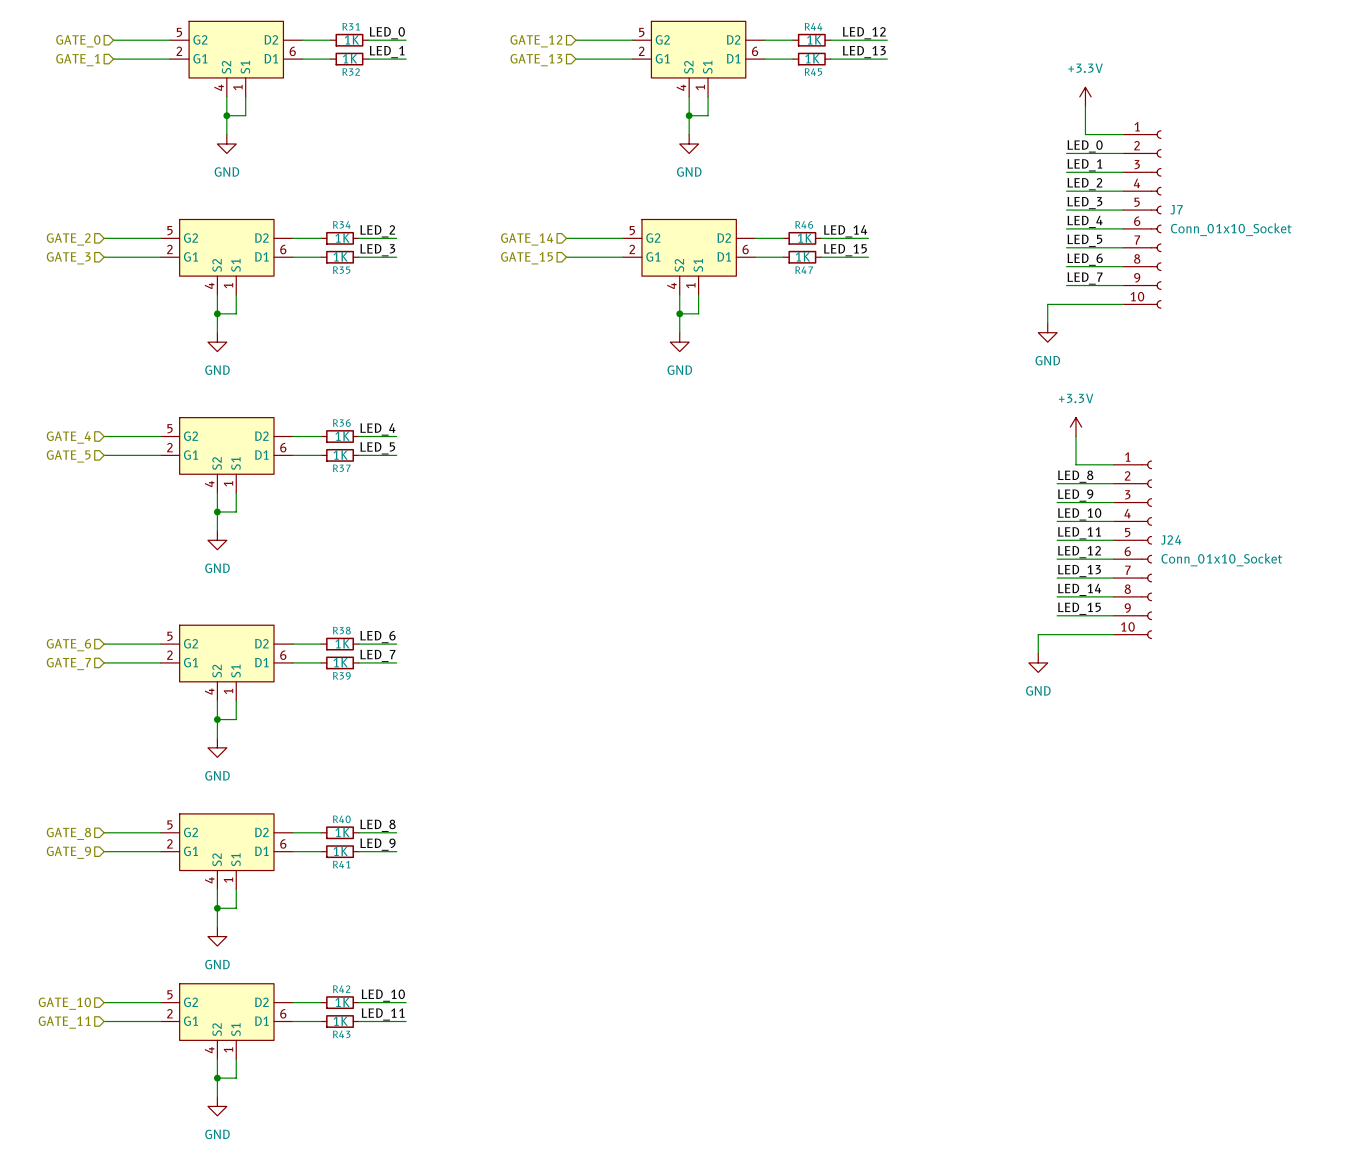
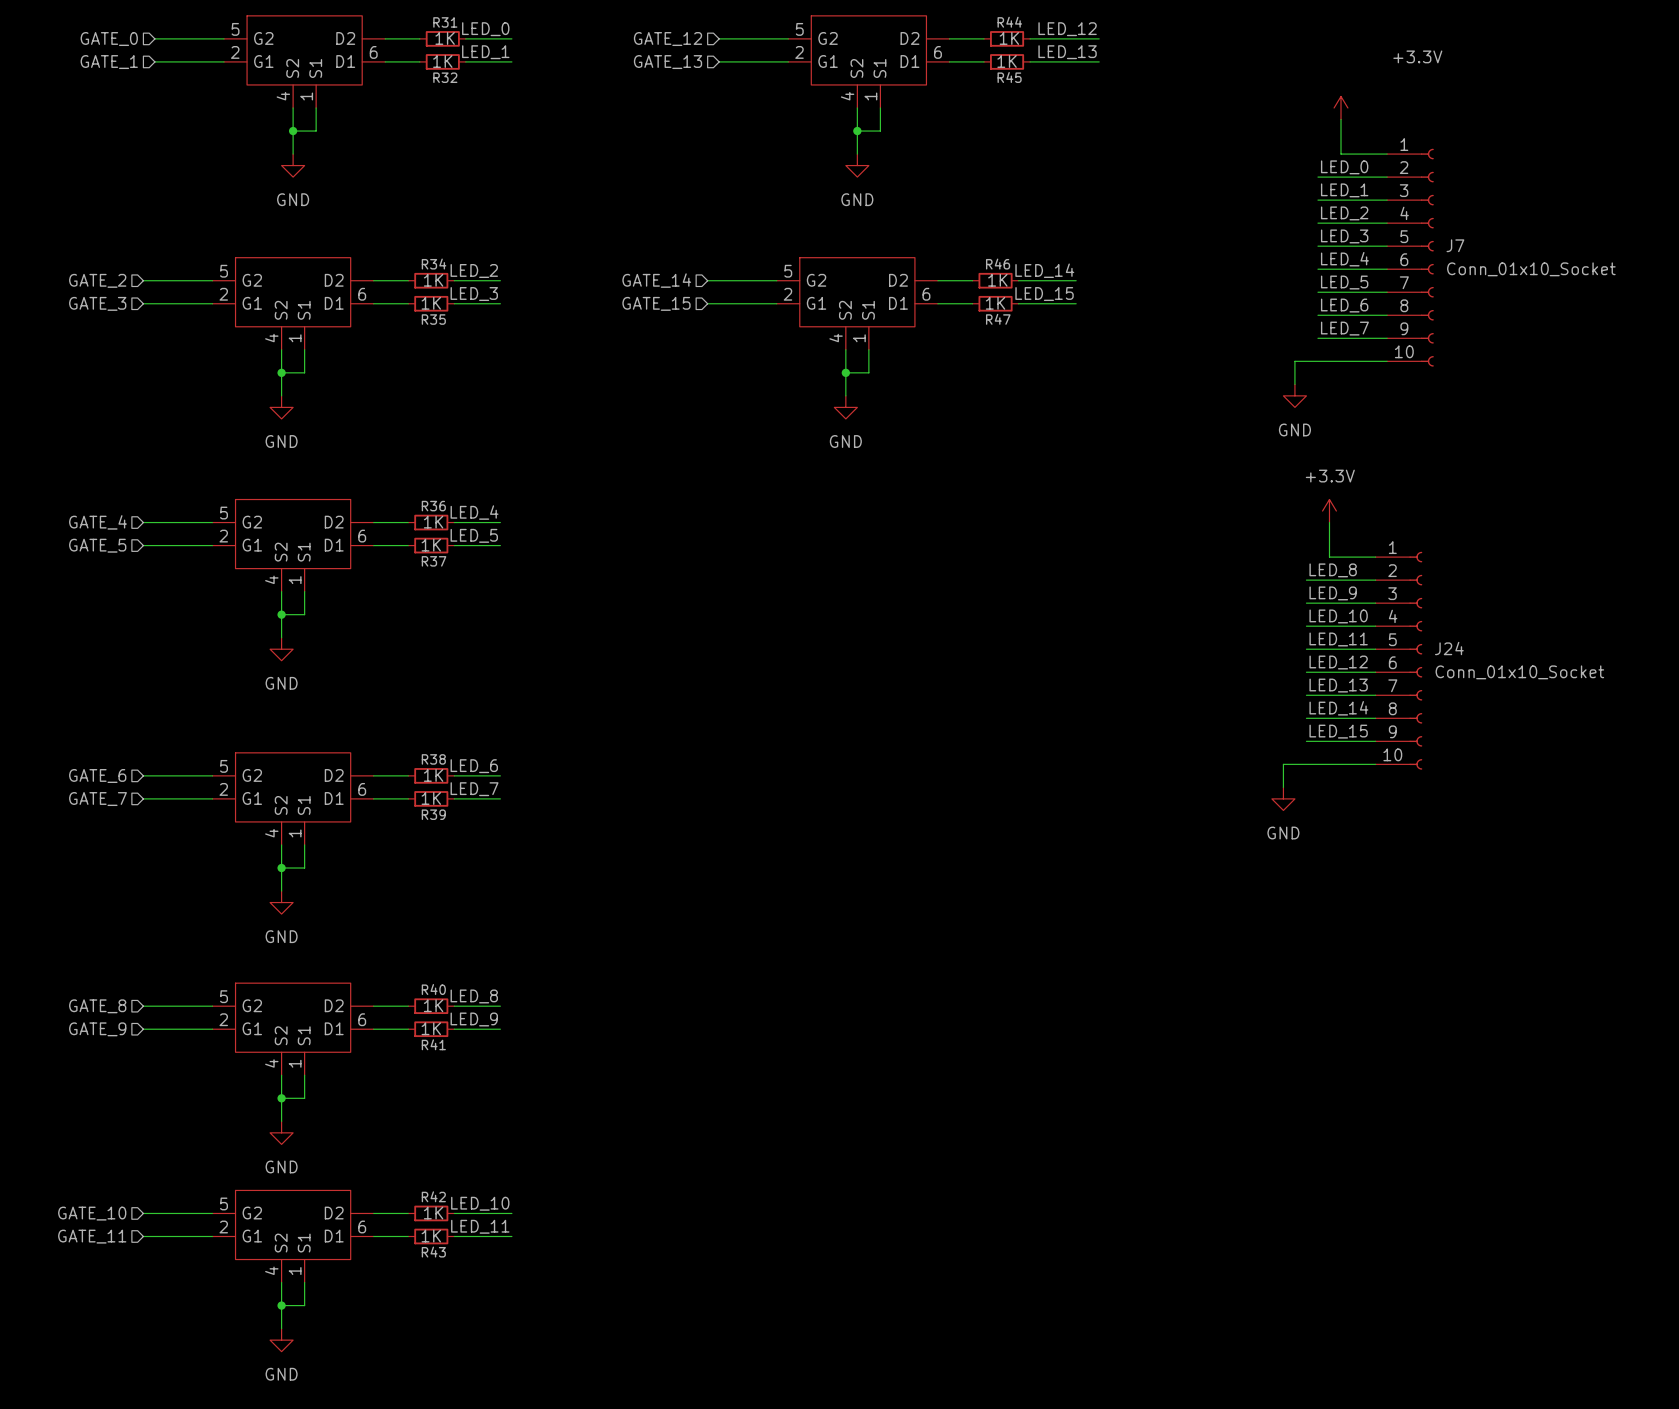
power symbol text position: +3.3V (1085, 68) -> +3.3V (1417, 56)

